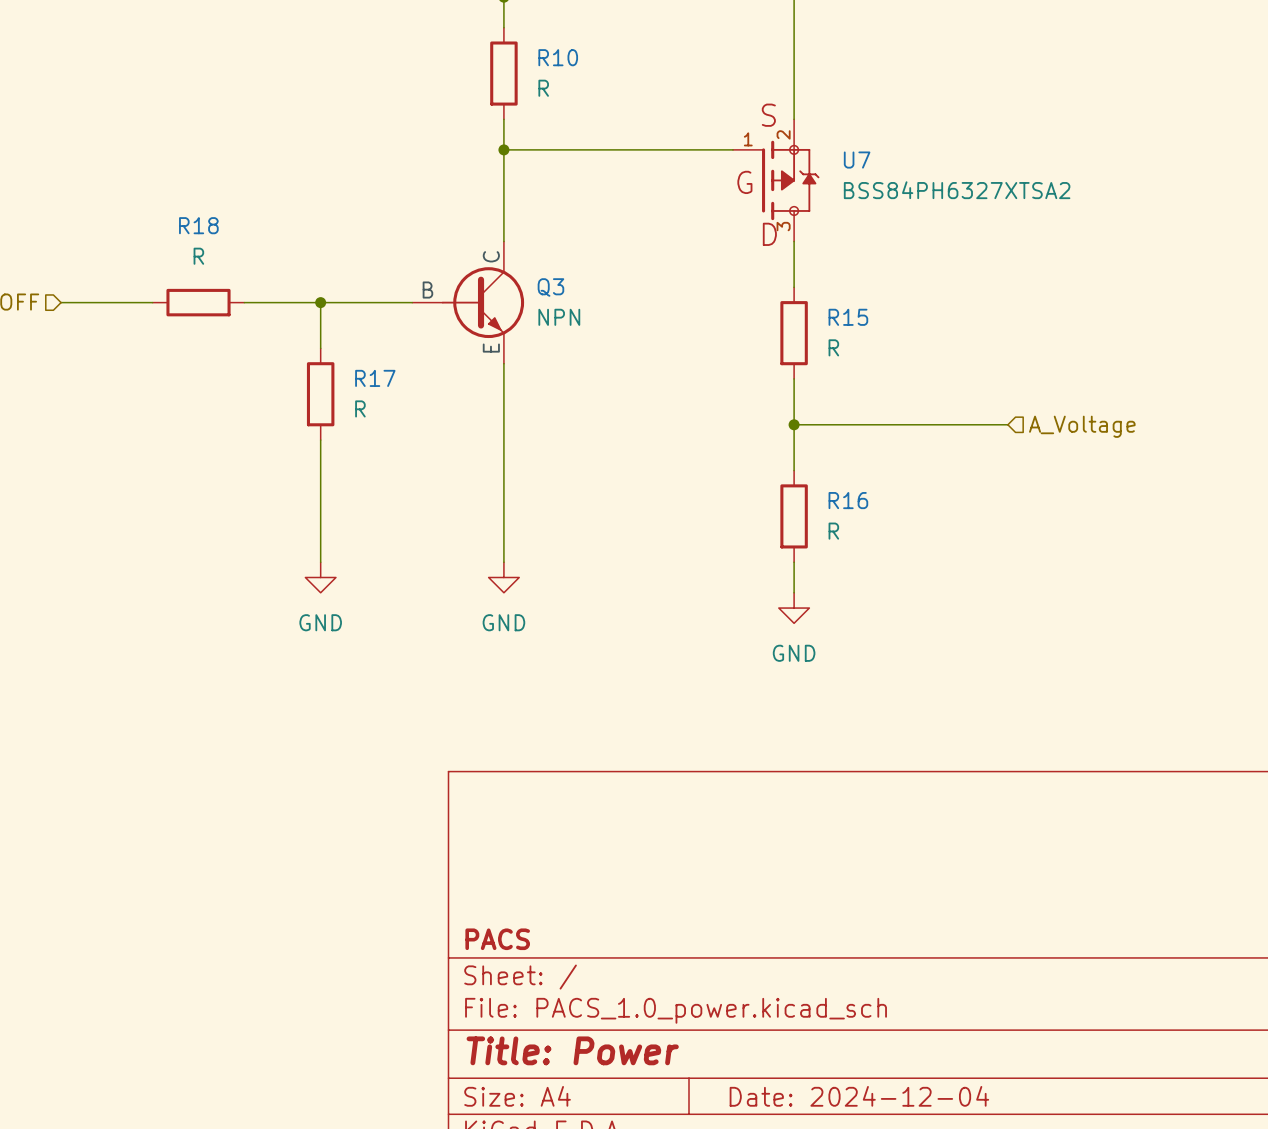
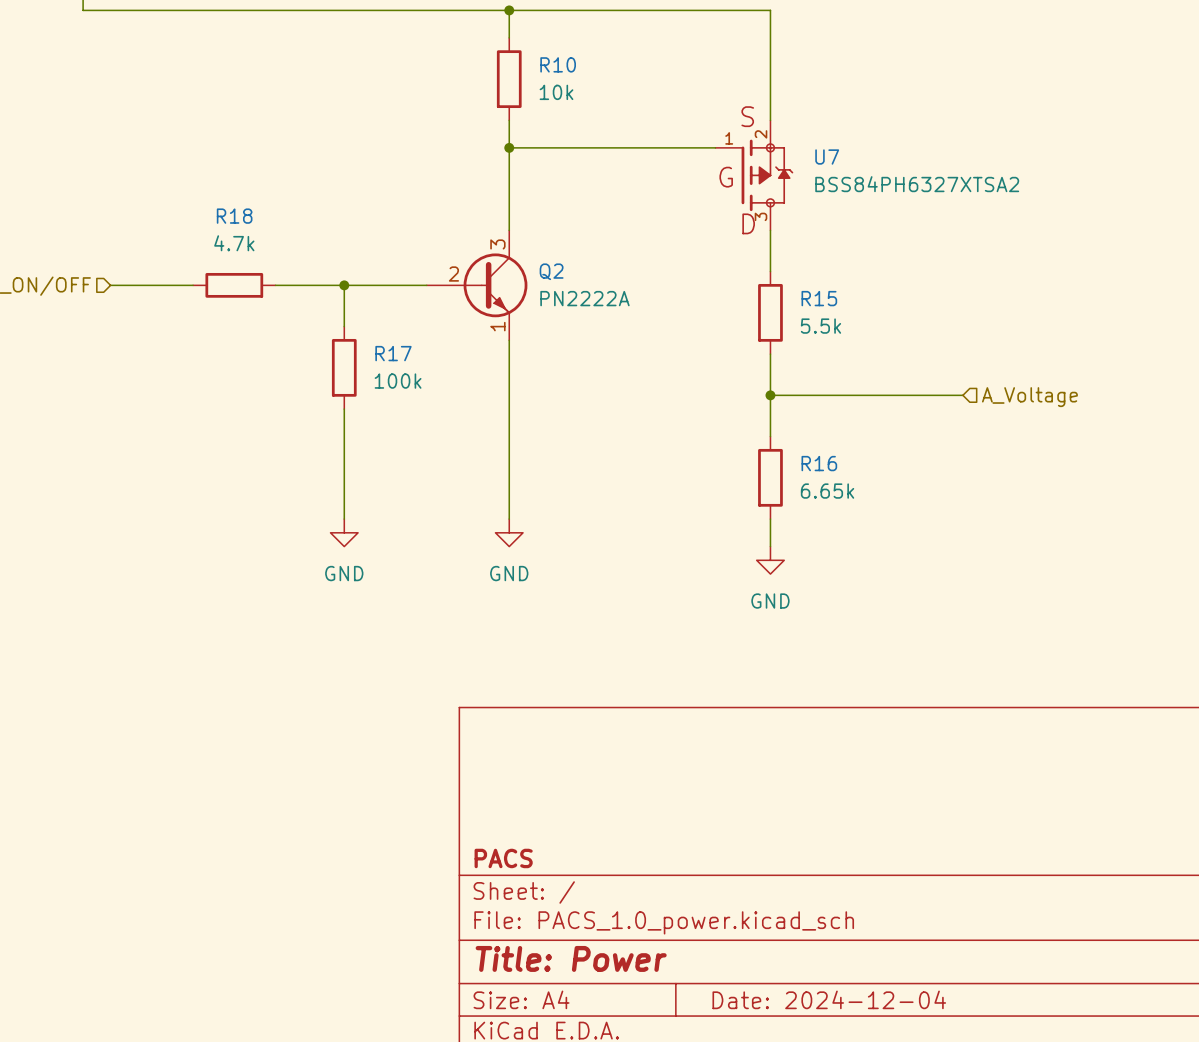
R10 value: R (543, 88) -> 10k (556, 92)
R18 value: R (198, 256) -> 4.7k (234, 243)
Q3: NPN (468, 302) -> none
Q2: none -> PN2222A (477, 285)
R15 value: R (833, 347) -> 5.5k (820, 326)
R17 value: R (360, 408) -> 100k (398, 381)
R16 value: R (833, 531) -> 6.65k (827, 491)

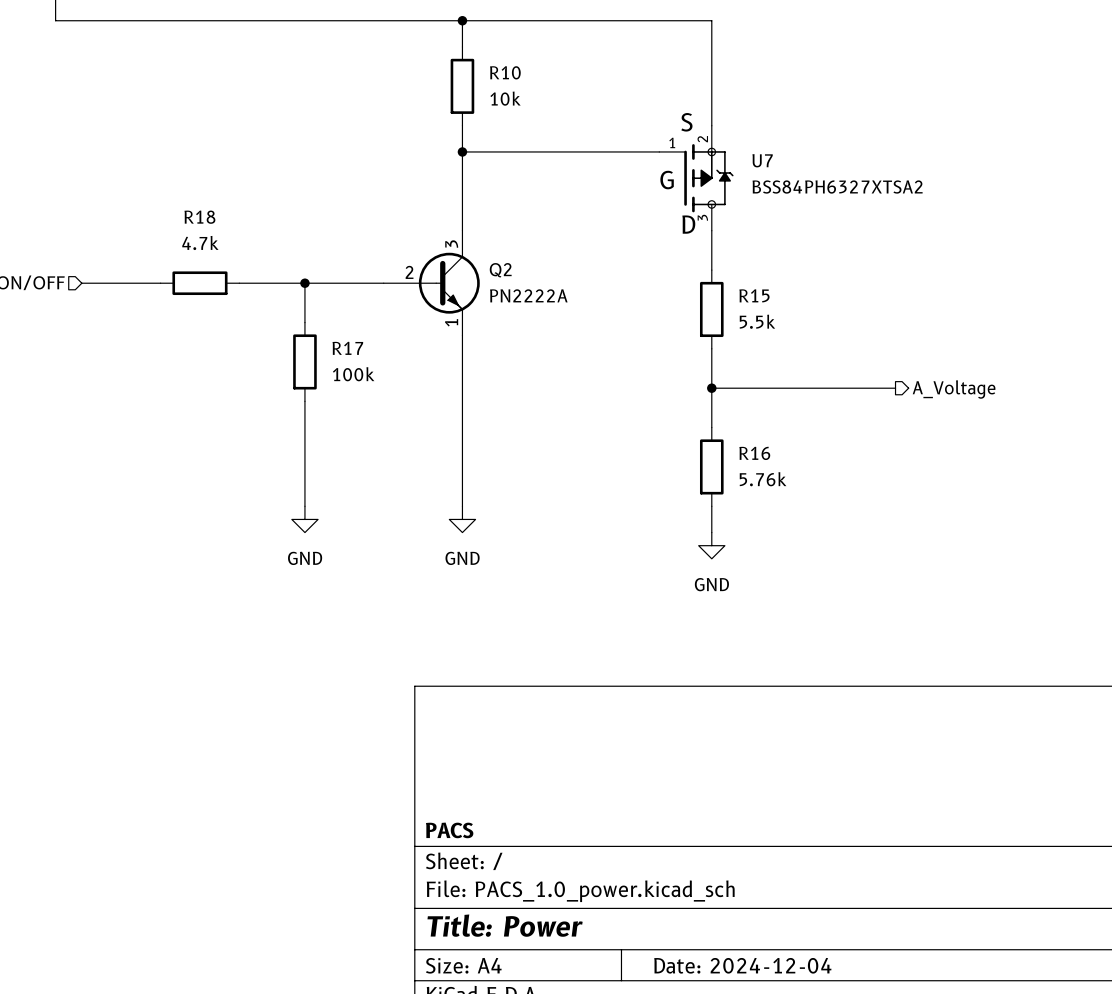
hierarchical label shape: input (1029, 397) -> output (954, 389)
R16 value: 6.65k (827, 491) -> 5.76k (763, 479)

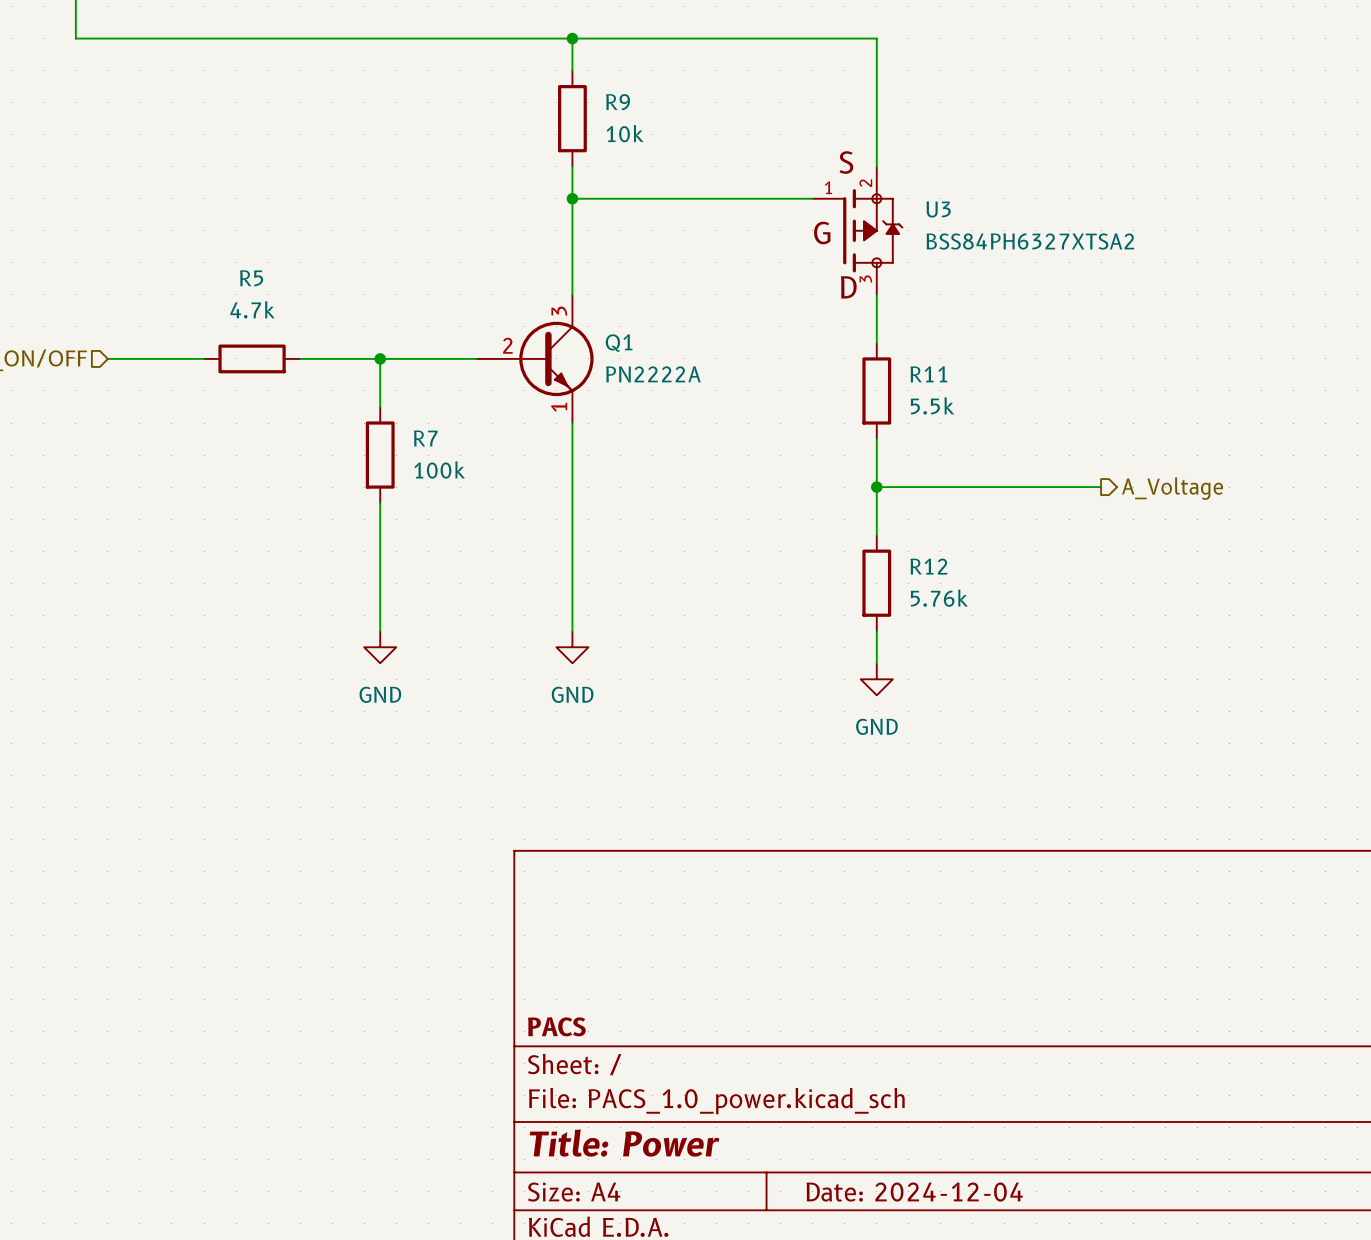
R10 name: R10 (505, 72) -> R9 (618, 102)
U7 name: U7 (762, 160) -> U3 (938, 209)
R18 name: R18 (199, 217) -> R5 (251, 278)
Q2 name: Q2 (500, 270) -> Q1 (619, 343)
R15 name: R15 (754, 295) -> R11 (928, 374)
R17 name: R17 (347, 348) -> R7 (425, 438)
R16 name: R16 (754, 453) -> R12 (928, 566)

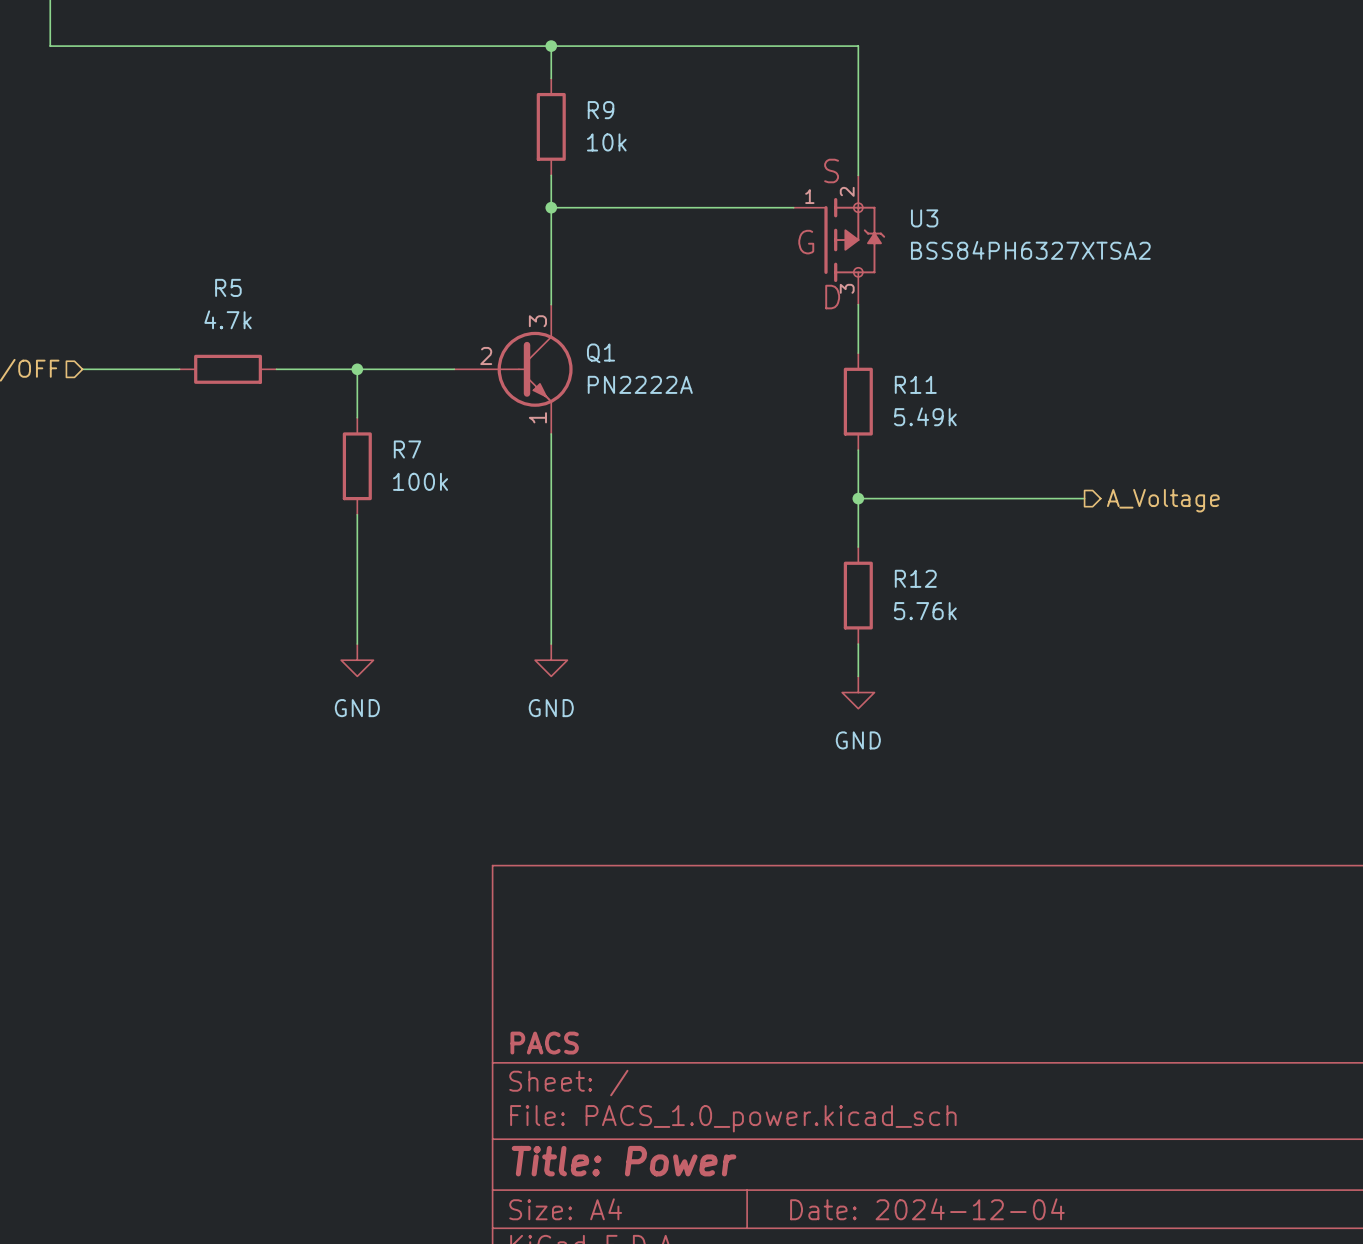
R11 value: 5.5k (932, 405) -> 5.49k (925, 416)

